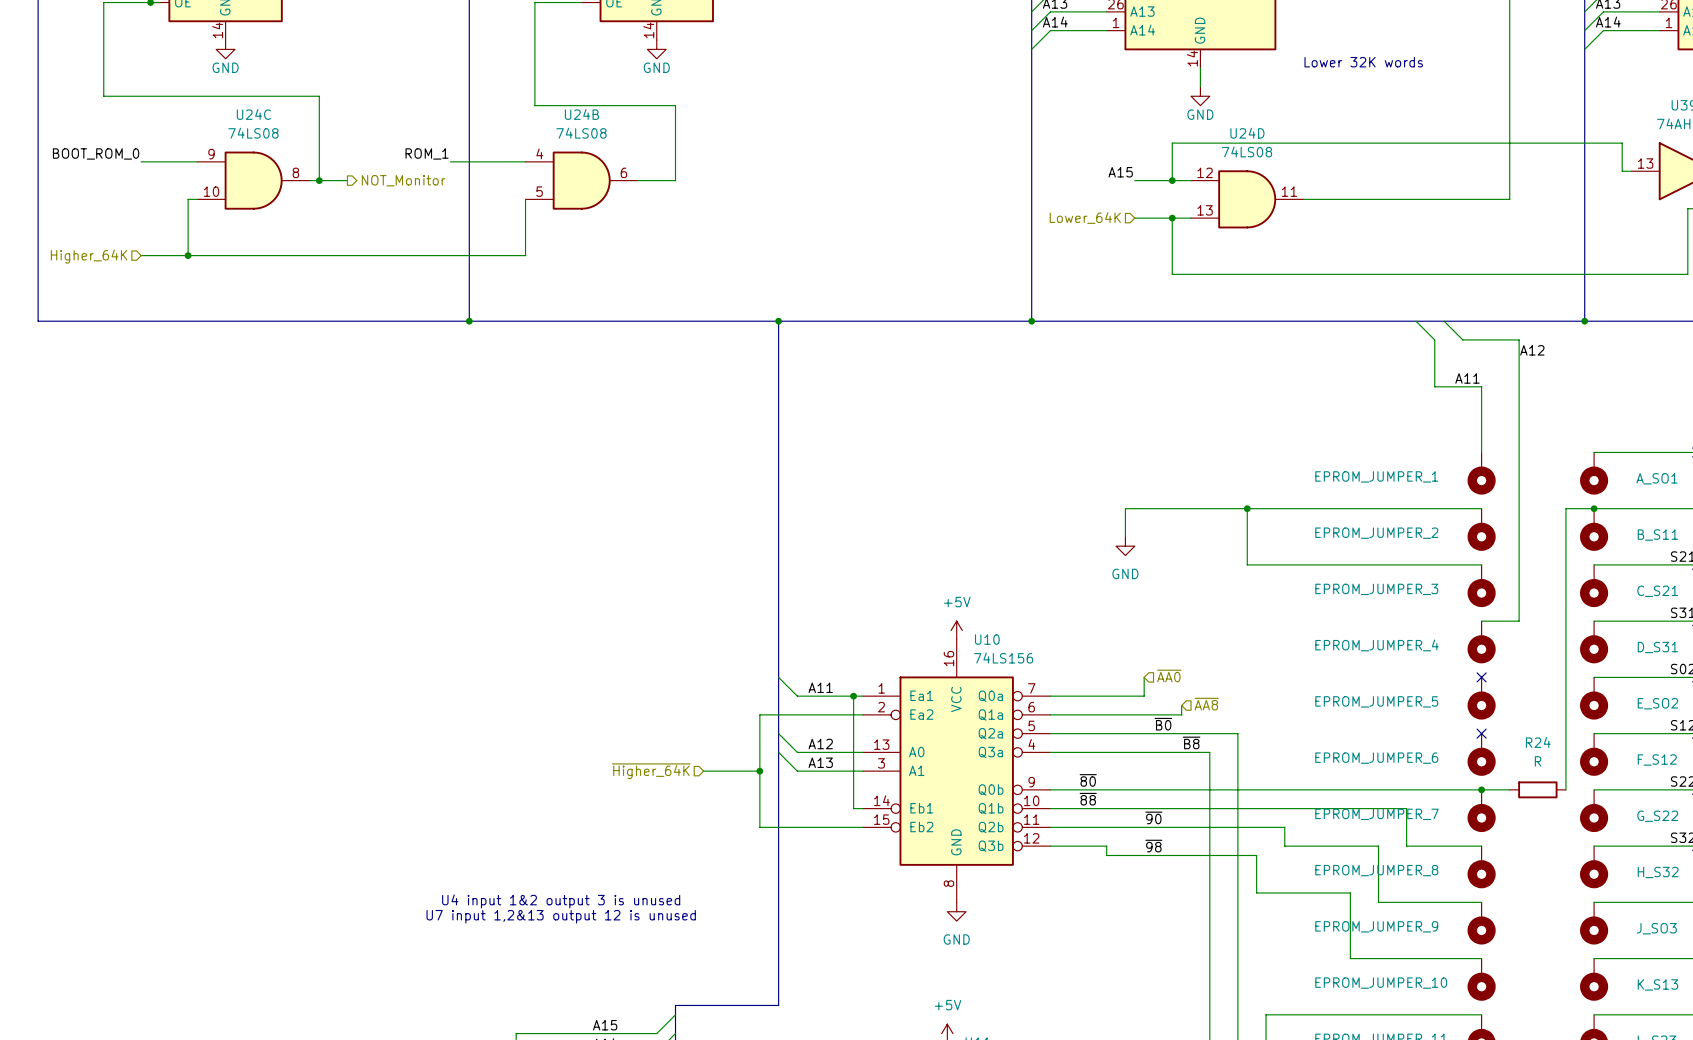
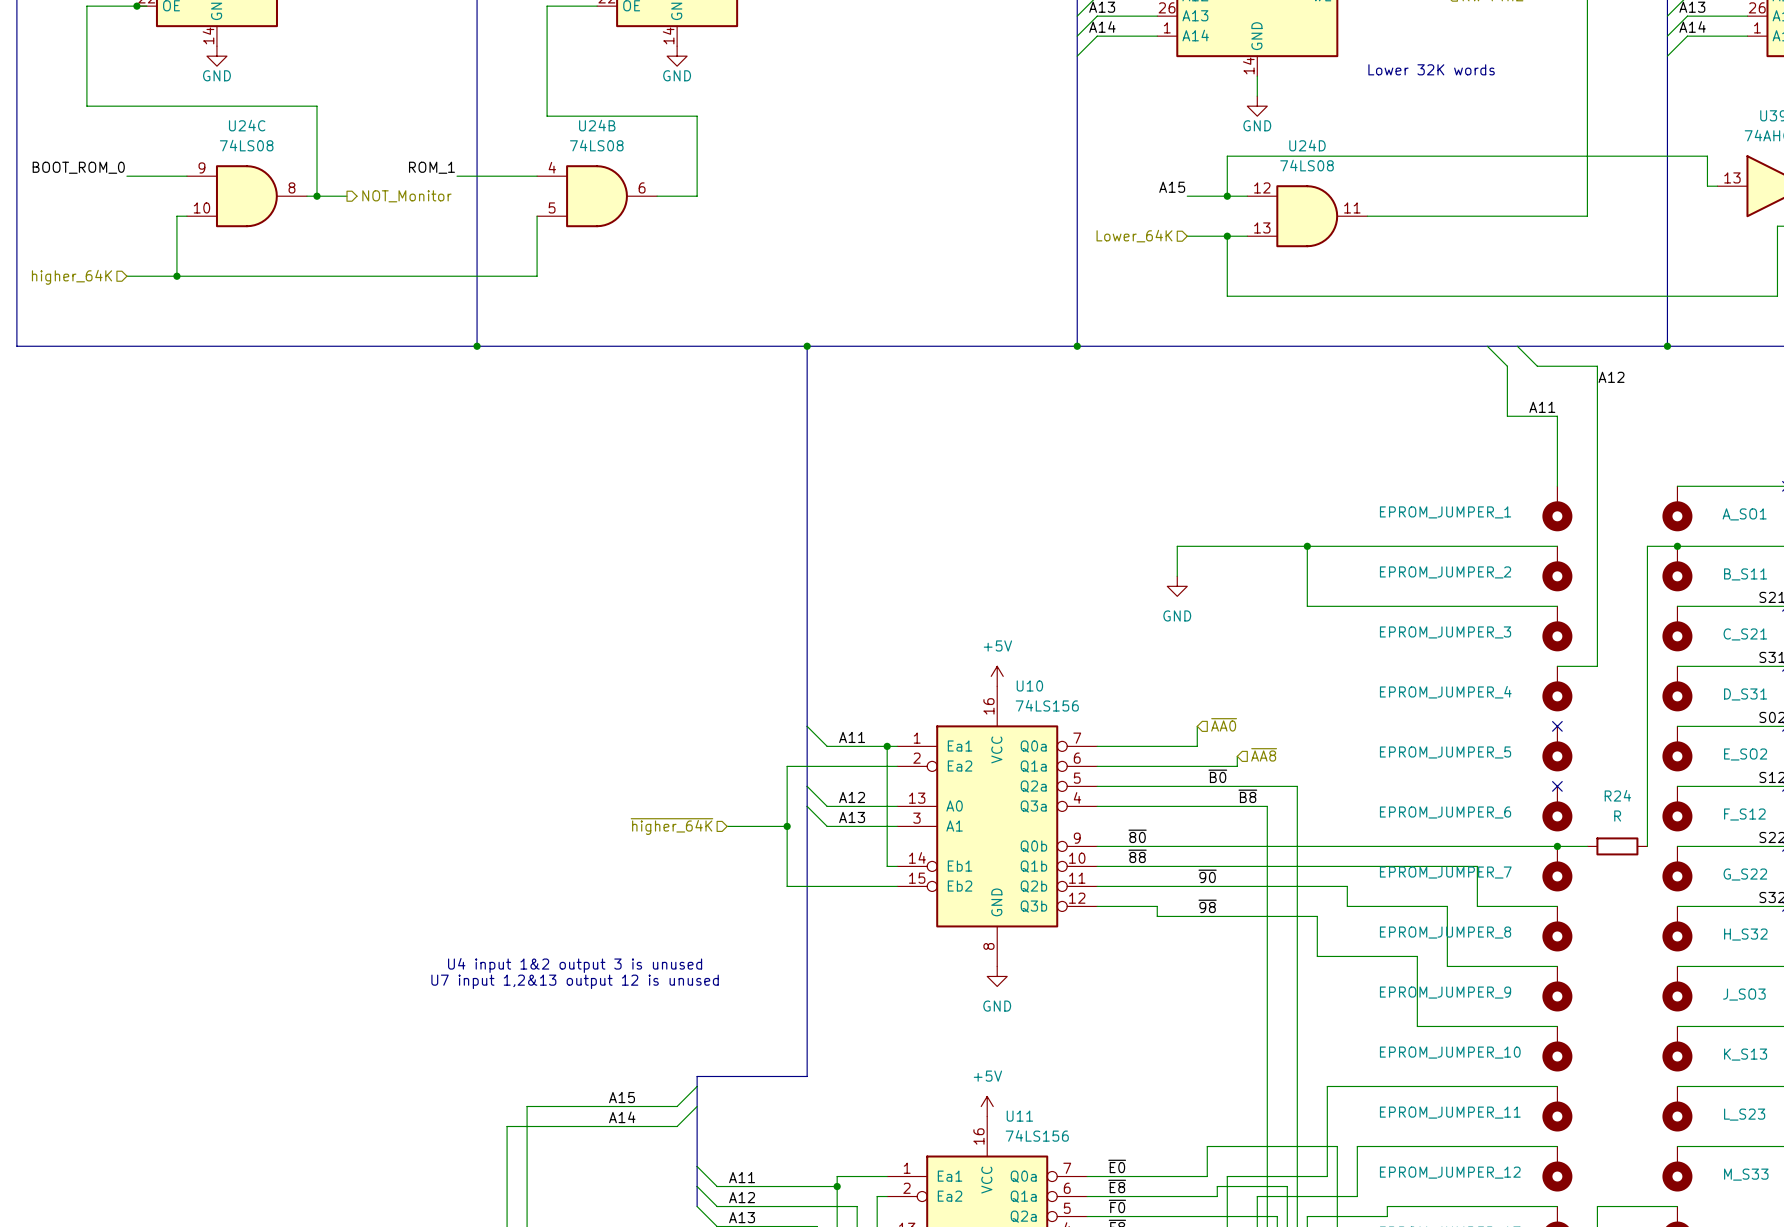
hierarchical label: Higher_64K (89, 256) -> higher_64K (72, 277)
hierarchical label: ~{Higher_64K} (651, 771) -> ~{higher_64K} (671, 826)

